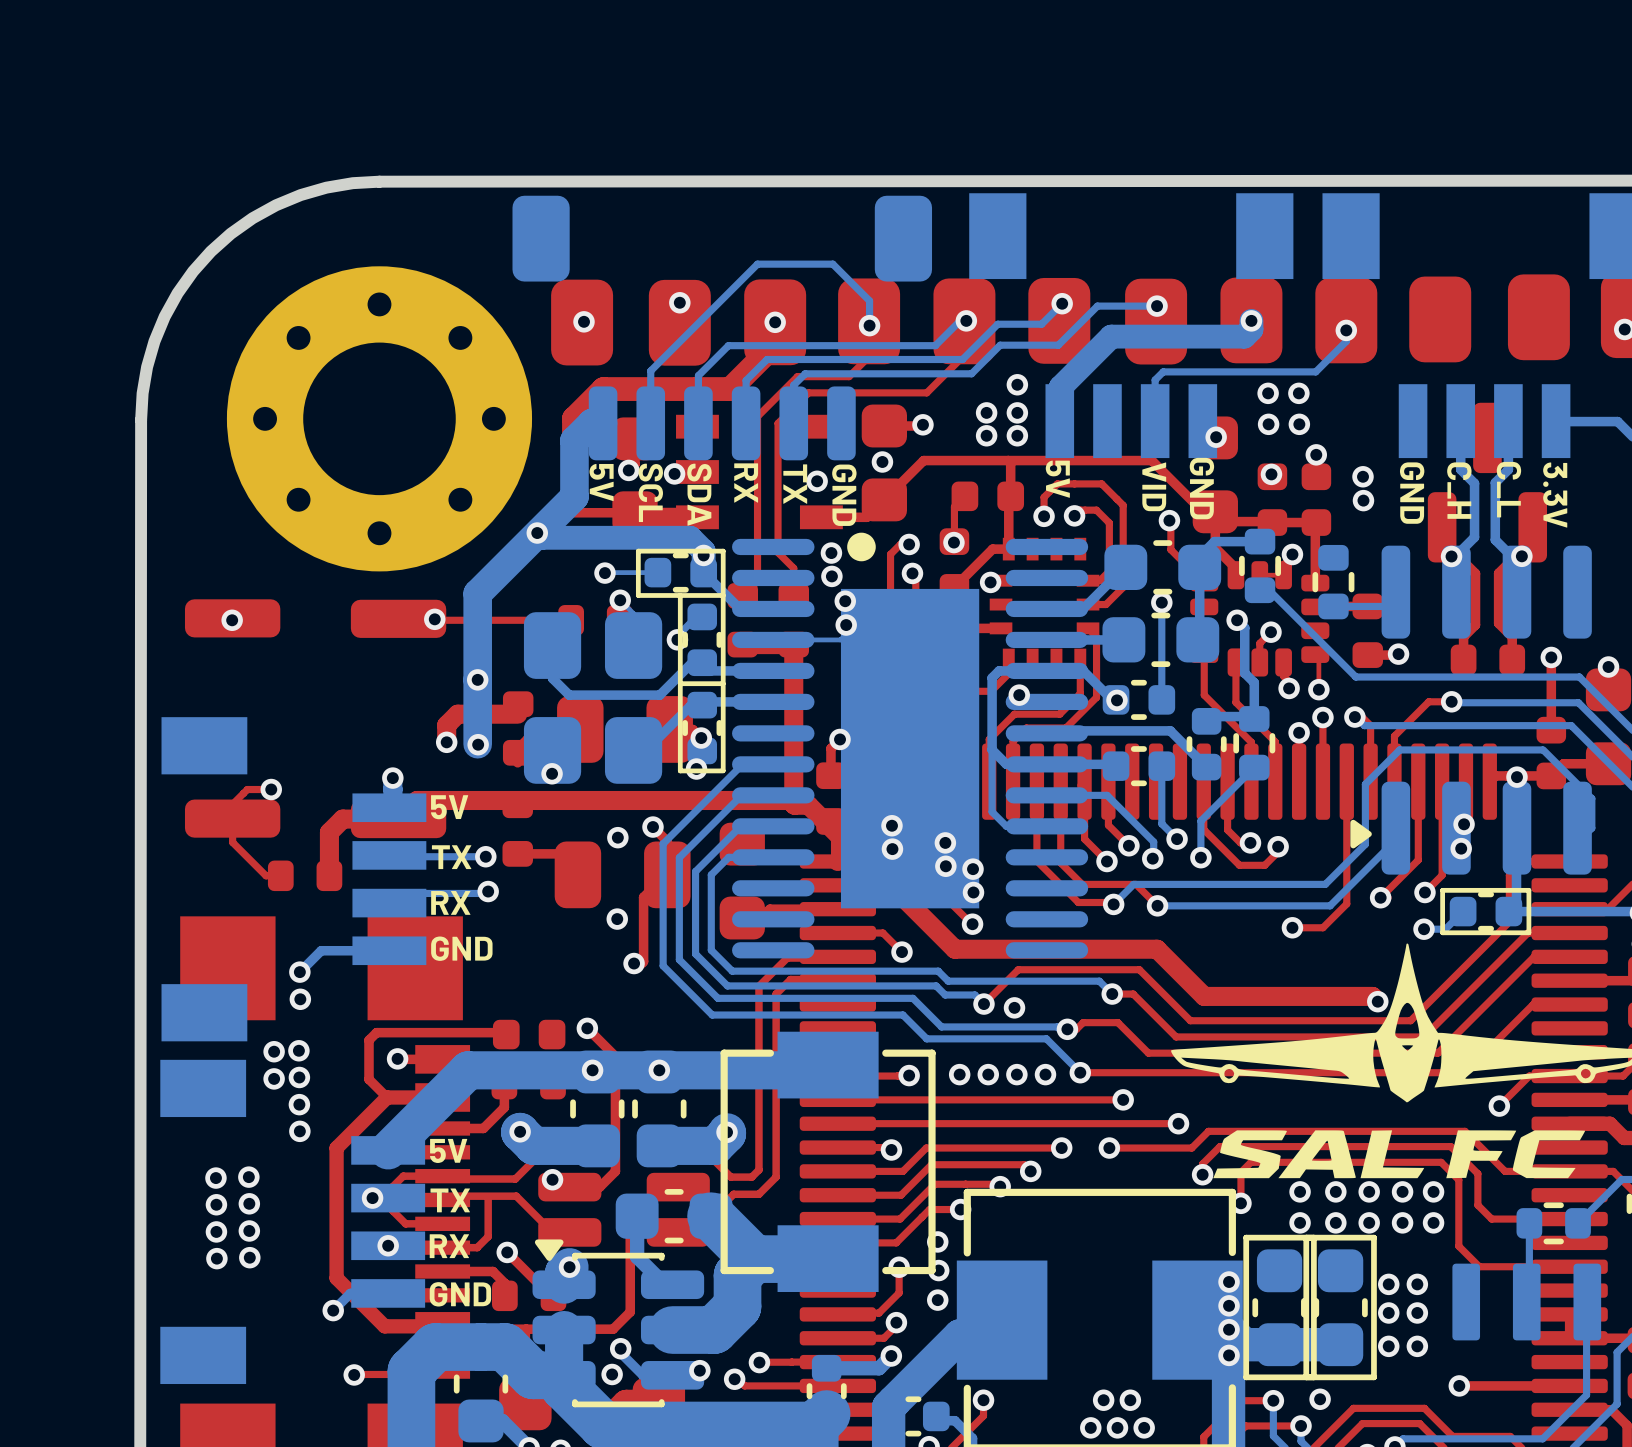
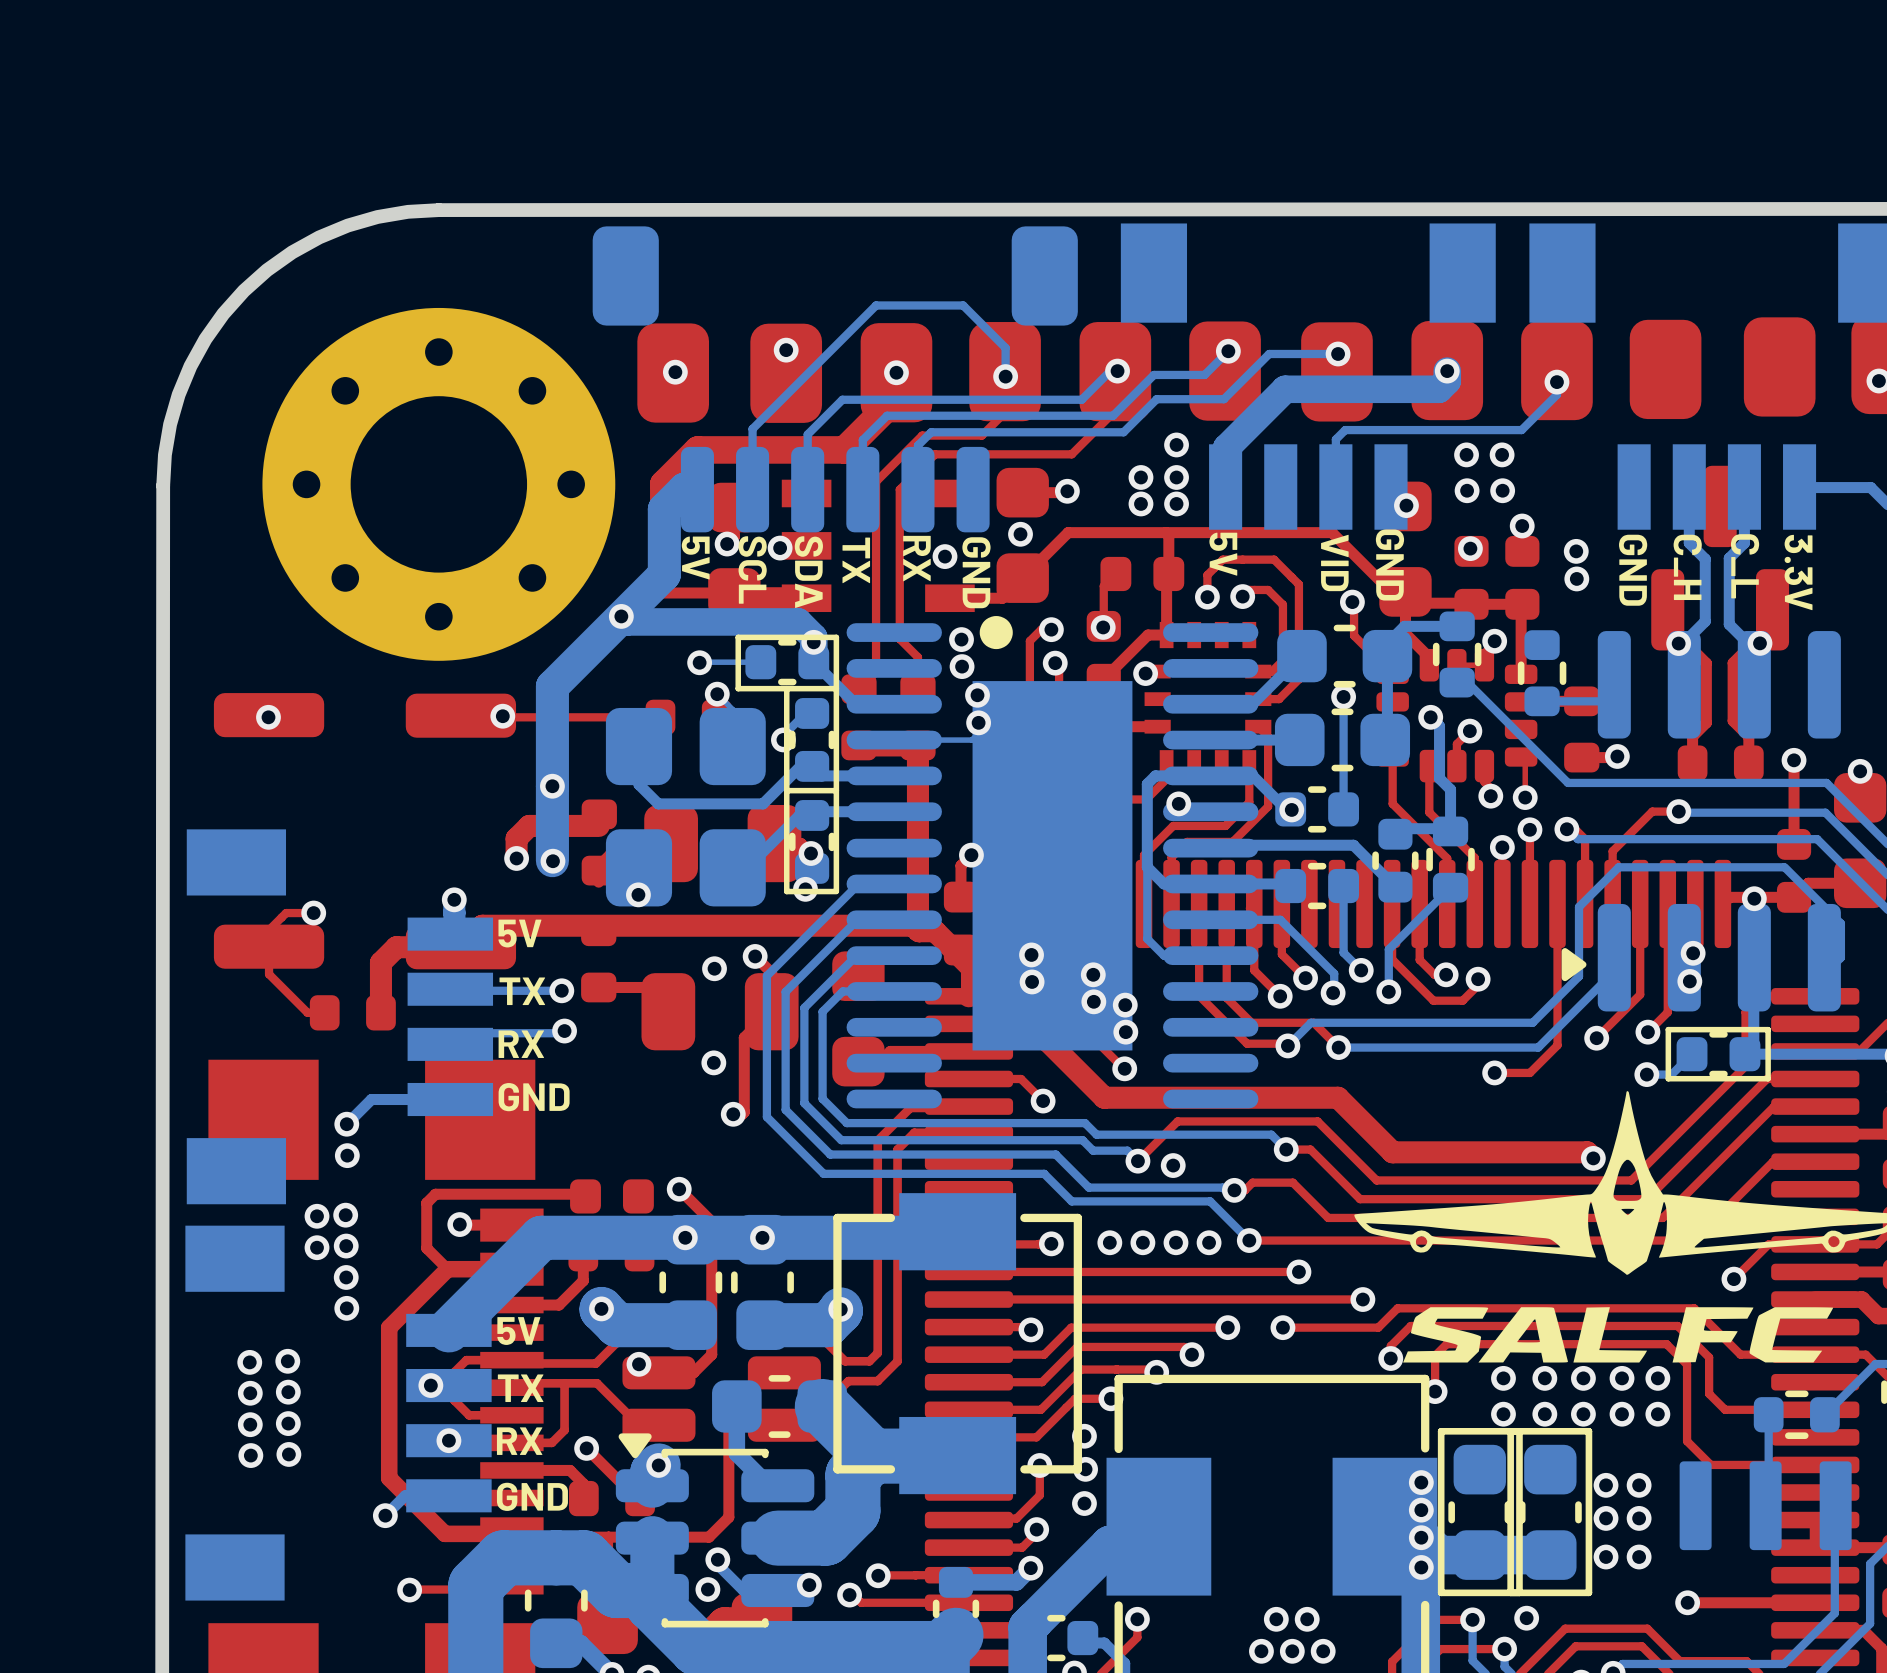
text position: RX (746, 483) -> RX (916, 558)
text position: TX (795, 484) -> TX (856, 560)

